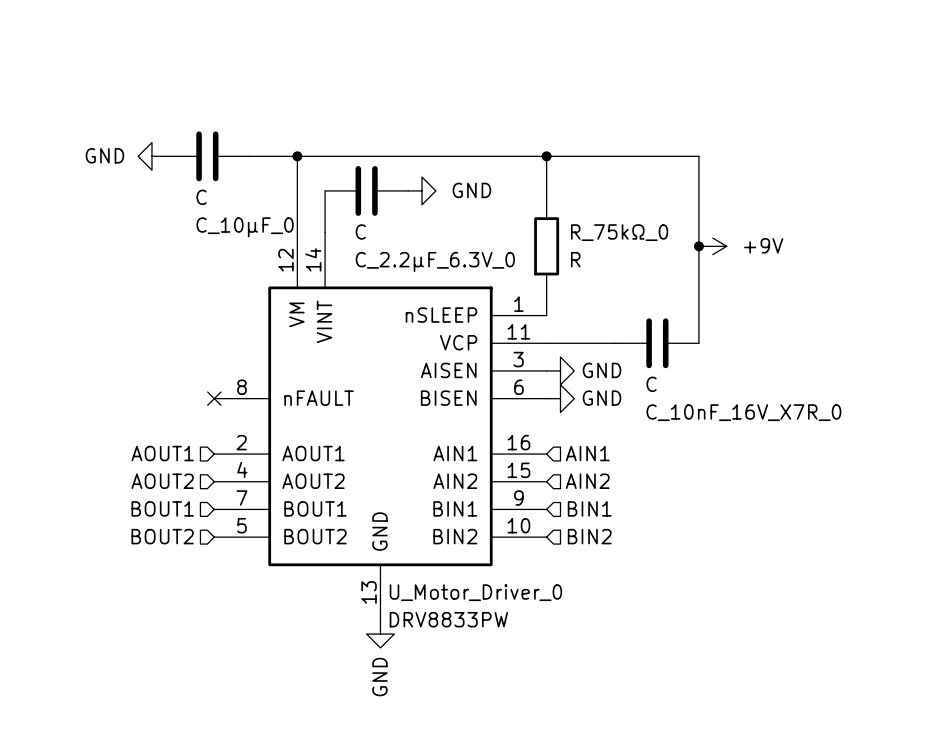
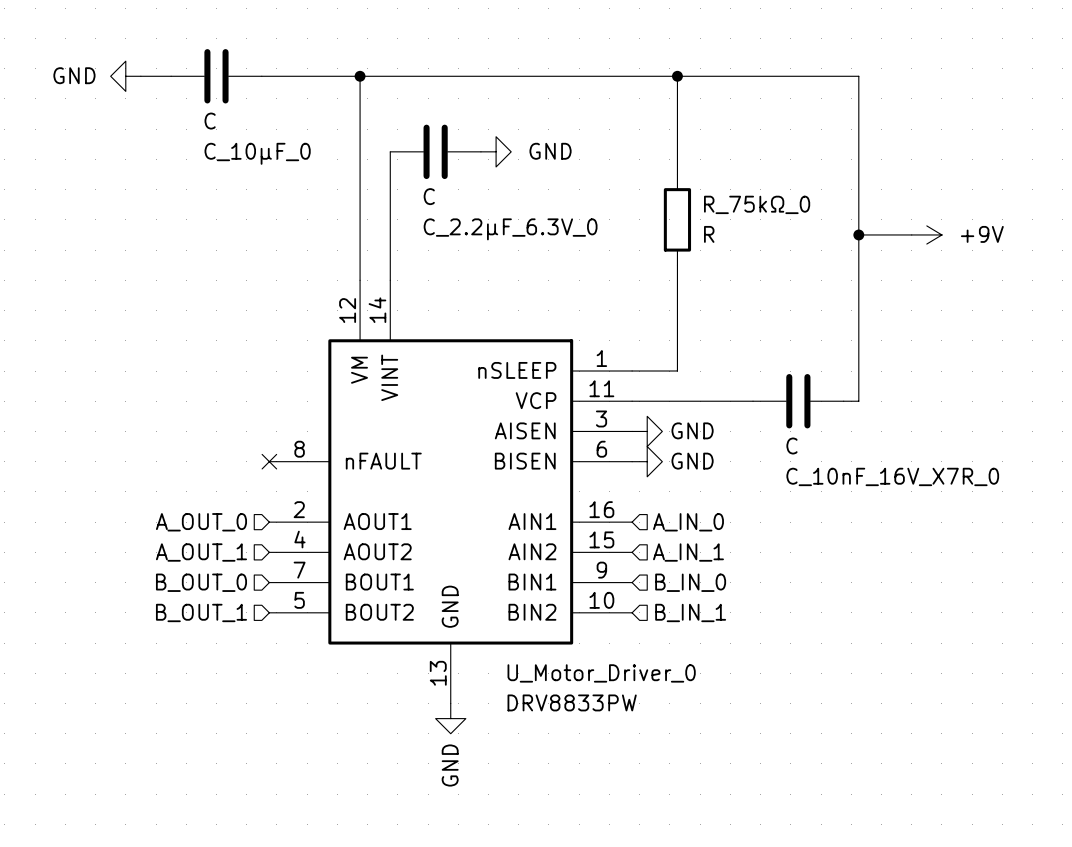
wire: none -> (140, 76) (171, 76)
wire: none -> (261, 76) (858, 76) (858, 401) (843, 401)
wire: none -> (360, 76) (360, 197)
junction: none -> (360, 76)
wire: none -> (677, 76) (677, 174)
junction: none -> (677, 76)
wire: none -> (390, 151) (390, 234)
power symbol position: GND (151, 156) -> GND (125, 76)
C_10μF_0 position: (207, 156) -> (216, 76)
wire: (248, 156) (698, 156) (698, 343) -> none
junction: (297, 156) -> none
wire: (546, 156) (546, 204) -> none
junction: (546, 156) -> none
C_2.2μF_6.3V_0 position: (366, 190) -> (435, 151)
power symbol position: GND (422, 190) -> GND (496, 151)
wire: none -> (858, 234) (911, 234)
junction: none -> (858, 234)
R_75kΩ_0 position: (546, 246) -> (677, 219)
junction: (698, 246) -> none
power symbol position: +9V (712, 246) -> +9V (926, 234)
wire: (546, 287) (546, 315) -> (677, 265) (677, 371) (632, 371)
C_10nF_16V_X7R_0 position: (657, 343) -> (798, 401)
hierarchical label: AOUT1 (162, 453) -> A_OUT_0 (201, 522)
hierarchical label: AIN1 (587, 453) -> A_IN_0 (688, 522)
hierarchical label: AOUT2 (162, 481) -> A_OUT_1 (201, 552)
hierarchical label: AIN2 (587, 481) -> A_IN_1 (688, 552)
hierarchical label: BOUT1 (162, 508) -> B_OUT_0 (201, 582)
hierarchical label: BIN1 (589, 508) -> B_IN_0 (690, 582)
hierarchical label: BOUT2 (162, 536) -> B_OUT_1 (201, 612)
hierarchical label: BIN2 (589, 536) -> B_IN_1 (690, 612)
U_Motor_Driver_0 name position: U_Motor_Driver_0 (475, 592) -> U_Motor_Driver_0 (601, 673)
U_Motor_Driver_0 value position: DRV8833PW (448, 619) -> DRV8833PW (572, 702)

